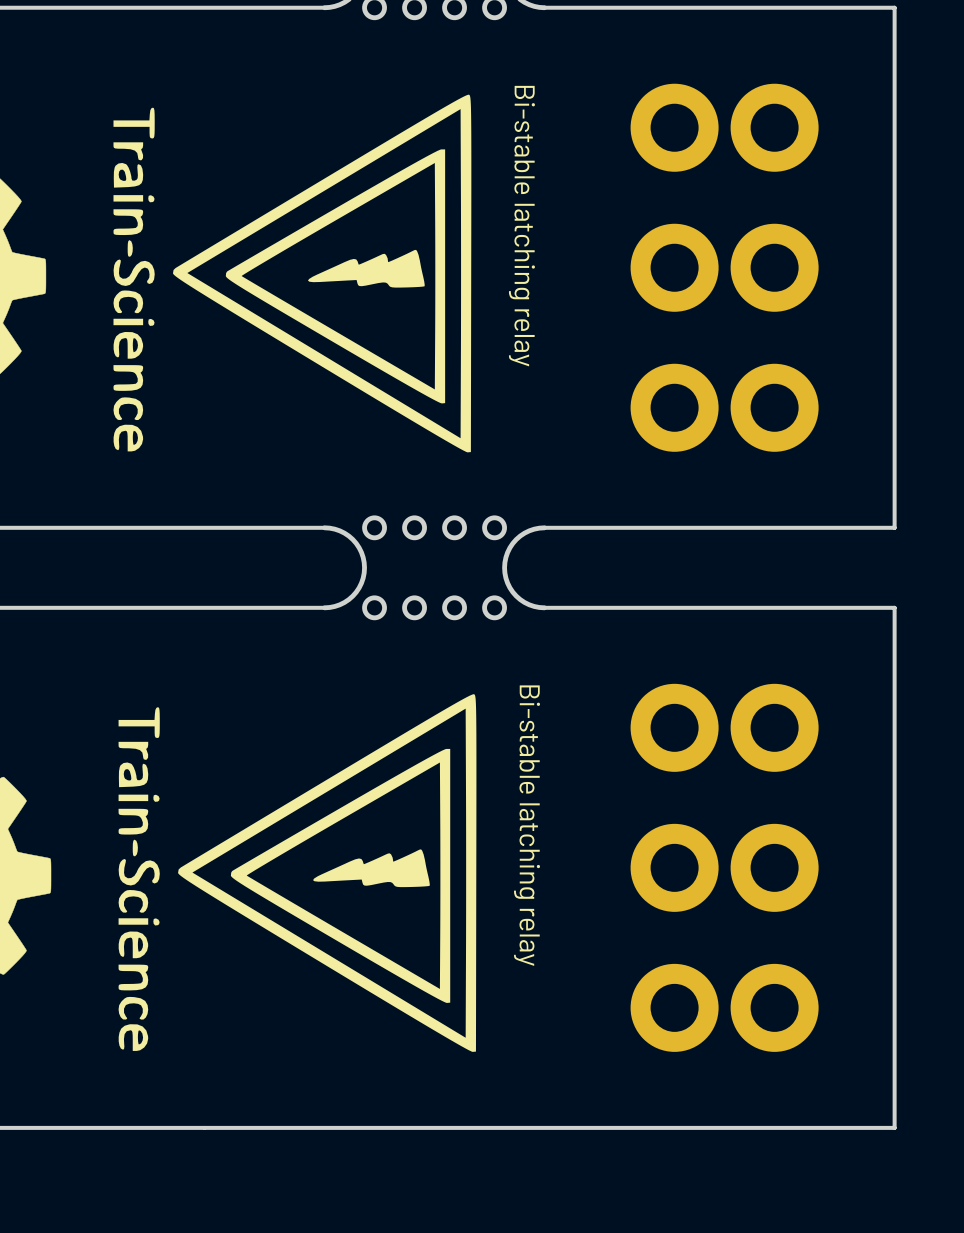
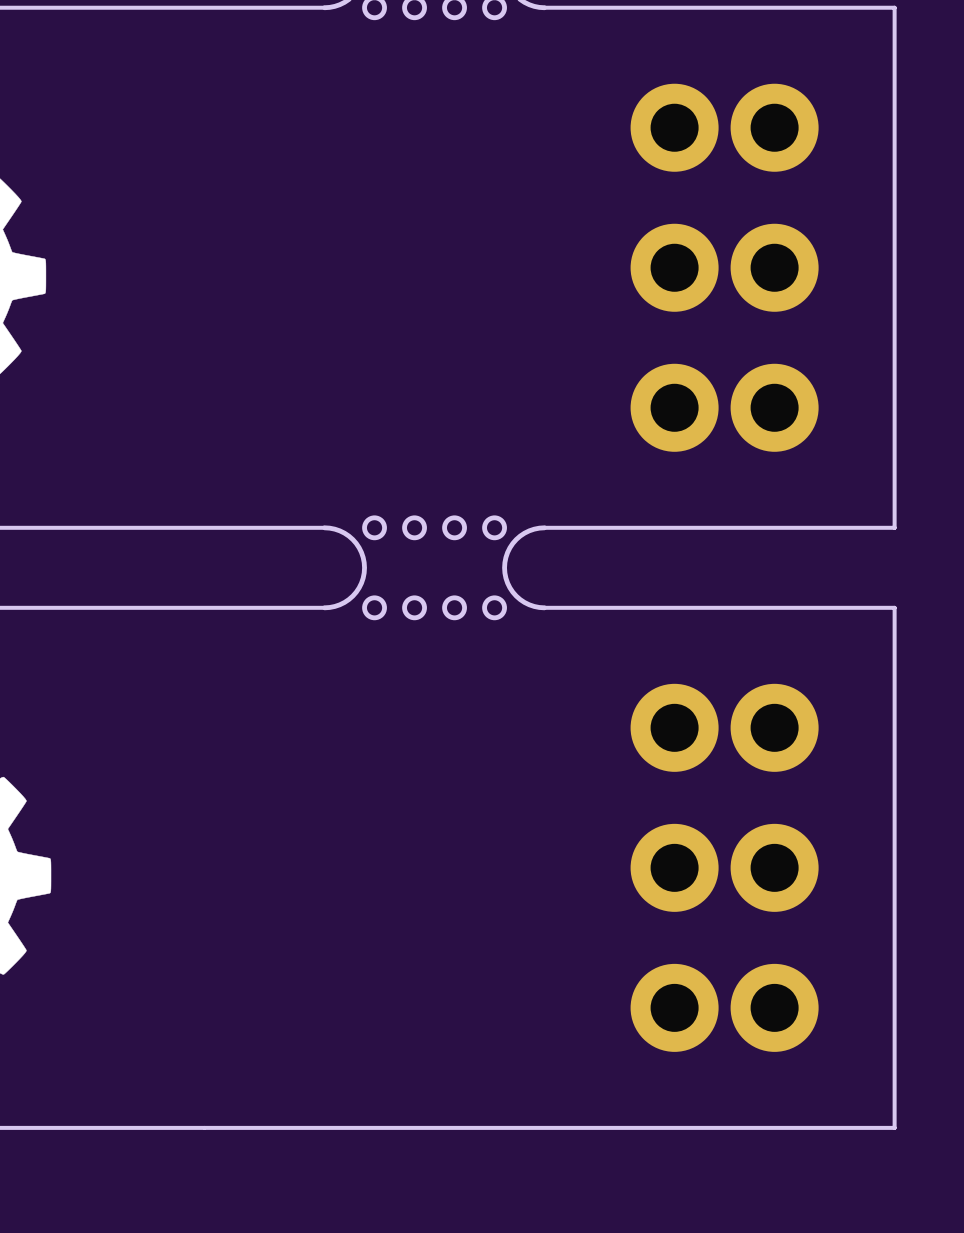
drawing: [113, 94, 472, 453] -> none
text: Bi-stable latching relay (521, 226) -> none
drawing: [118, 694, 477, 1052] -> none
text: Bi-stable latching relay (527, 825) -> none

